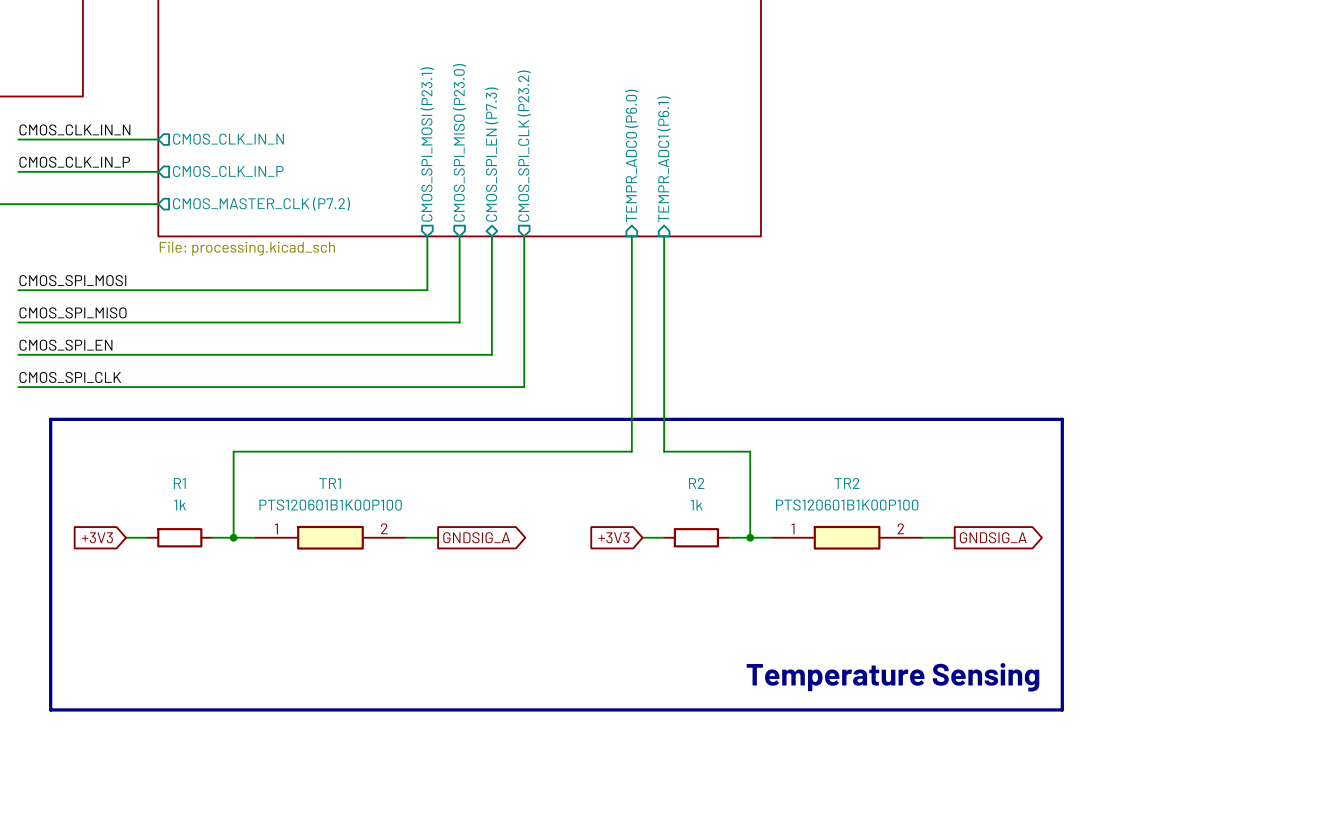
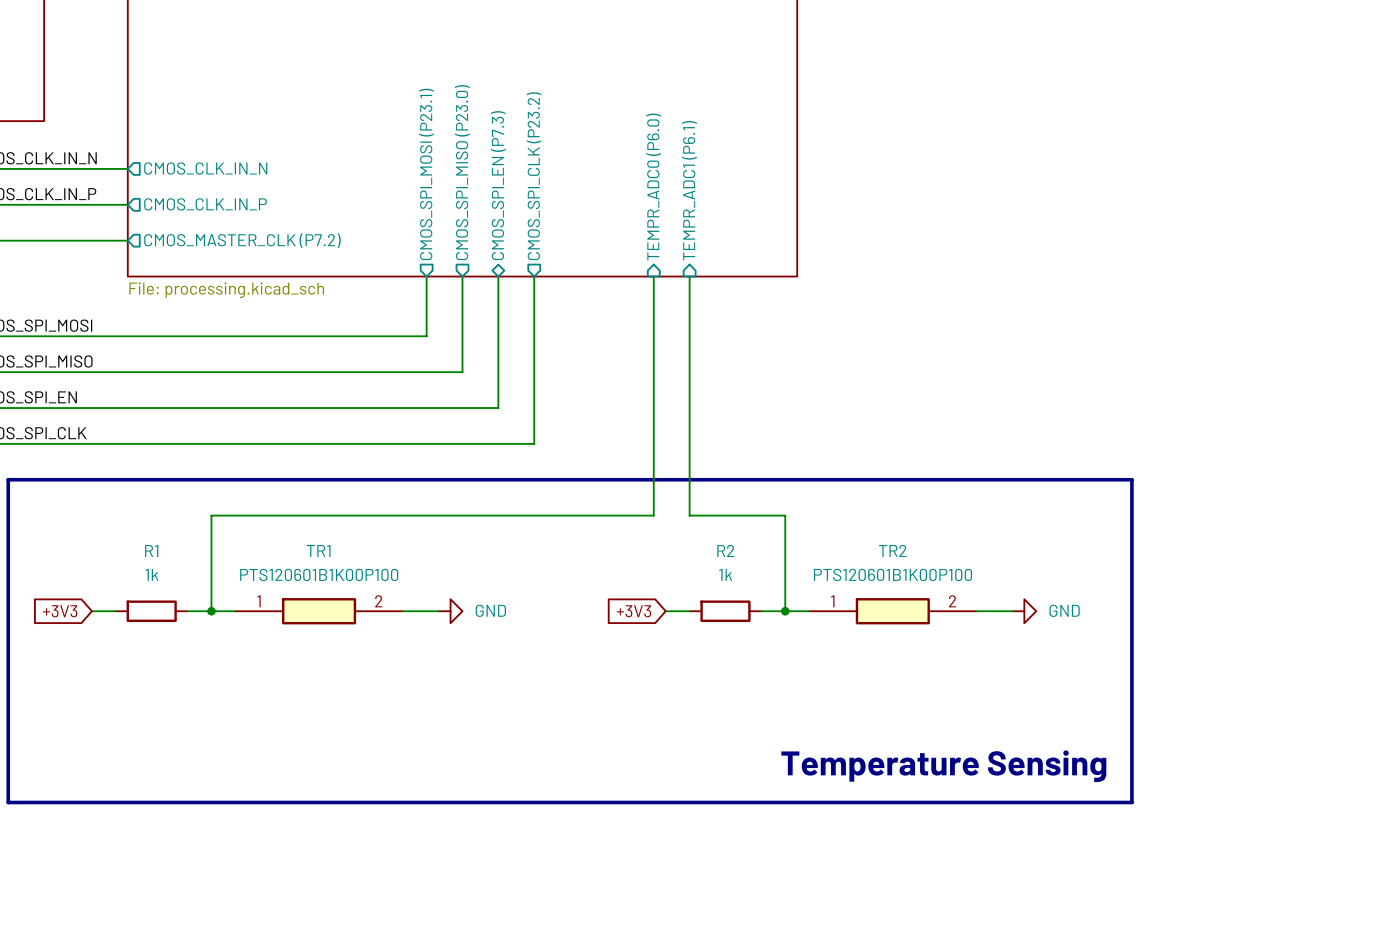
power symbol: none -> GND (450, 611)
global label: GNDSIG_A (476, 537) -> none
power symbol: none -> GND (1024, 611)
global label: GNDSIG_A (993, 537) -> none

